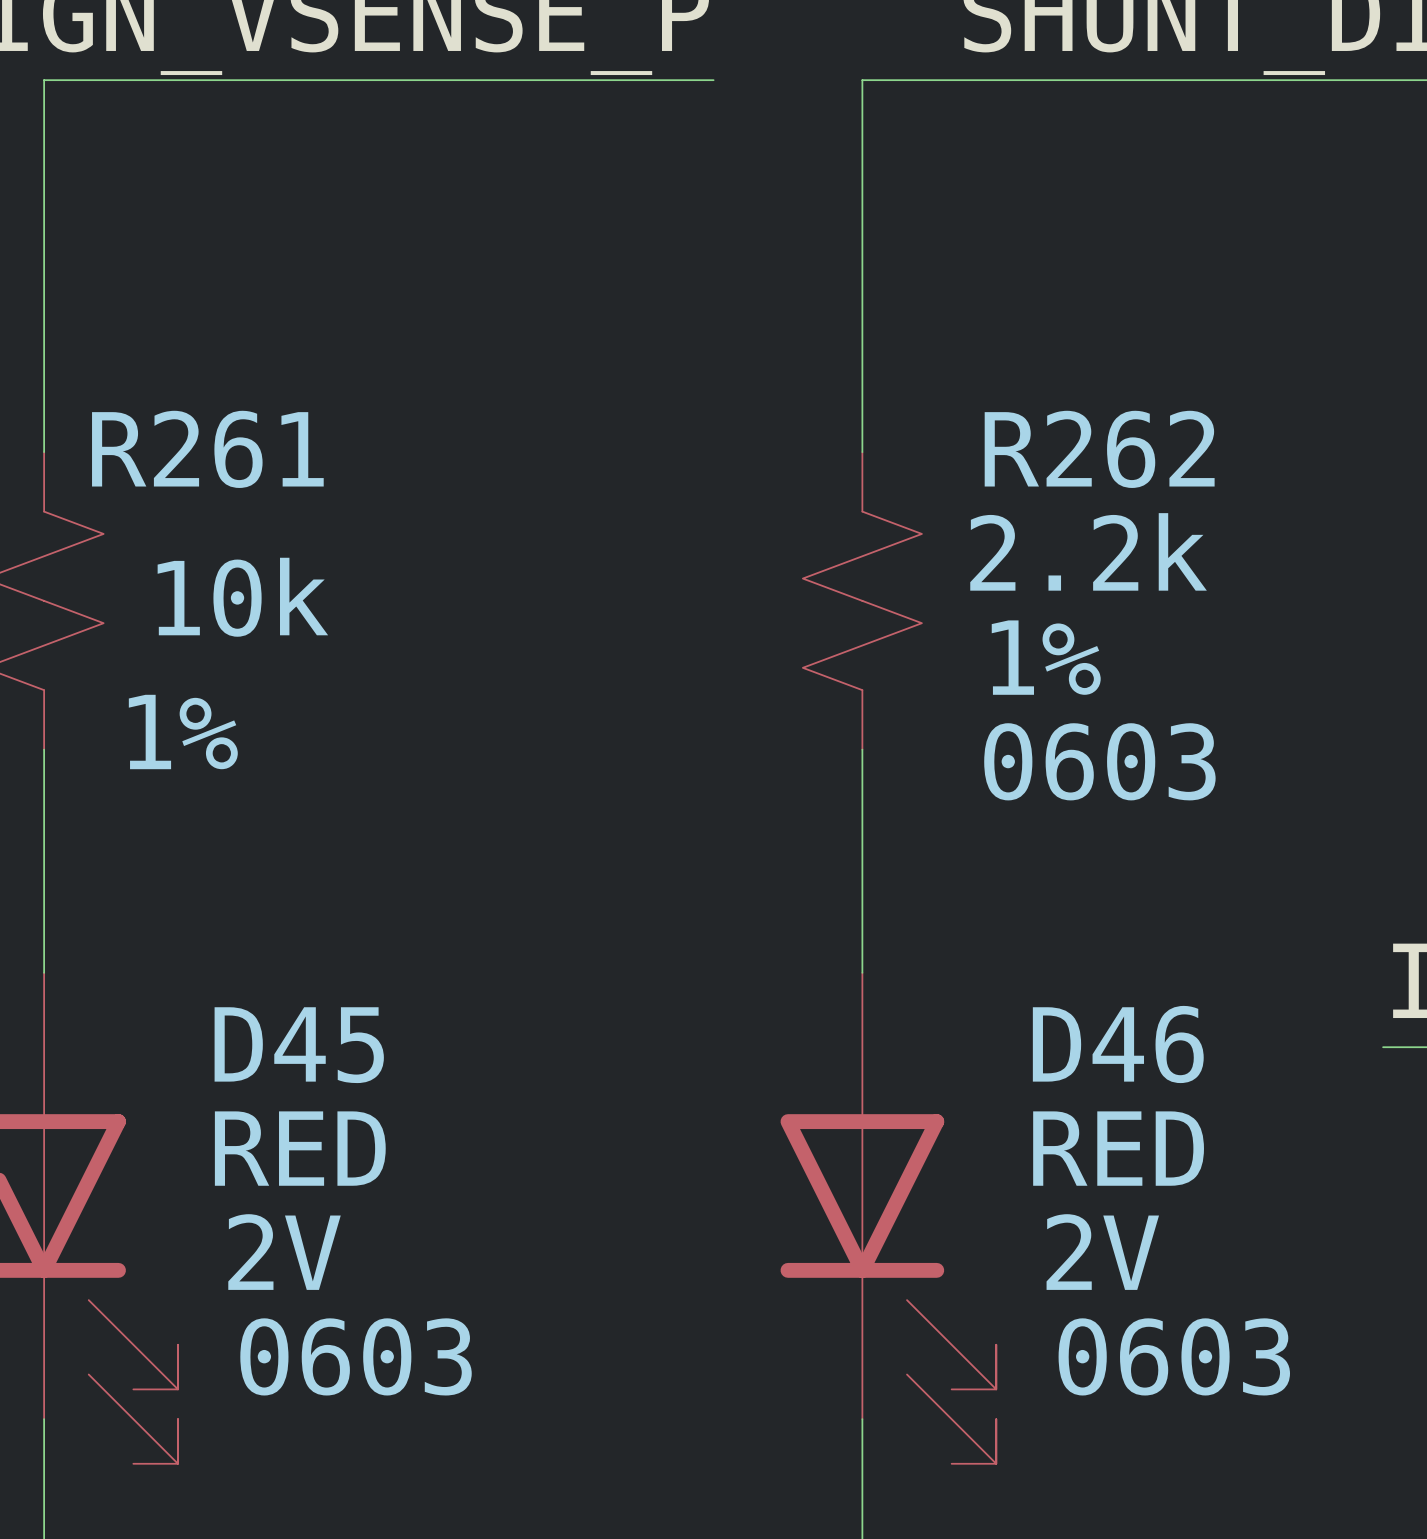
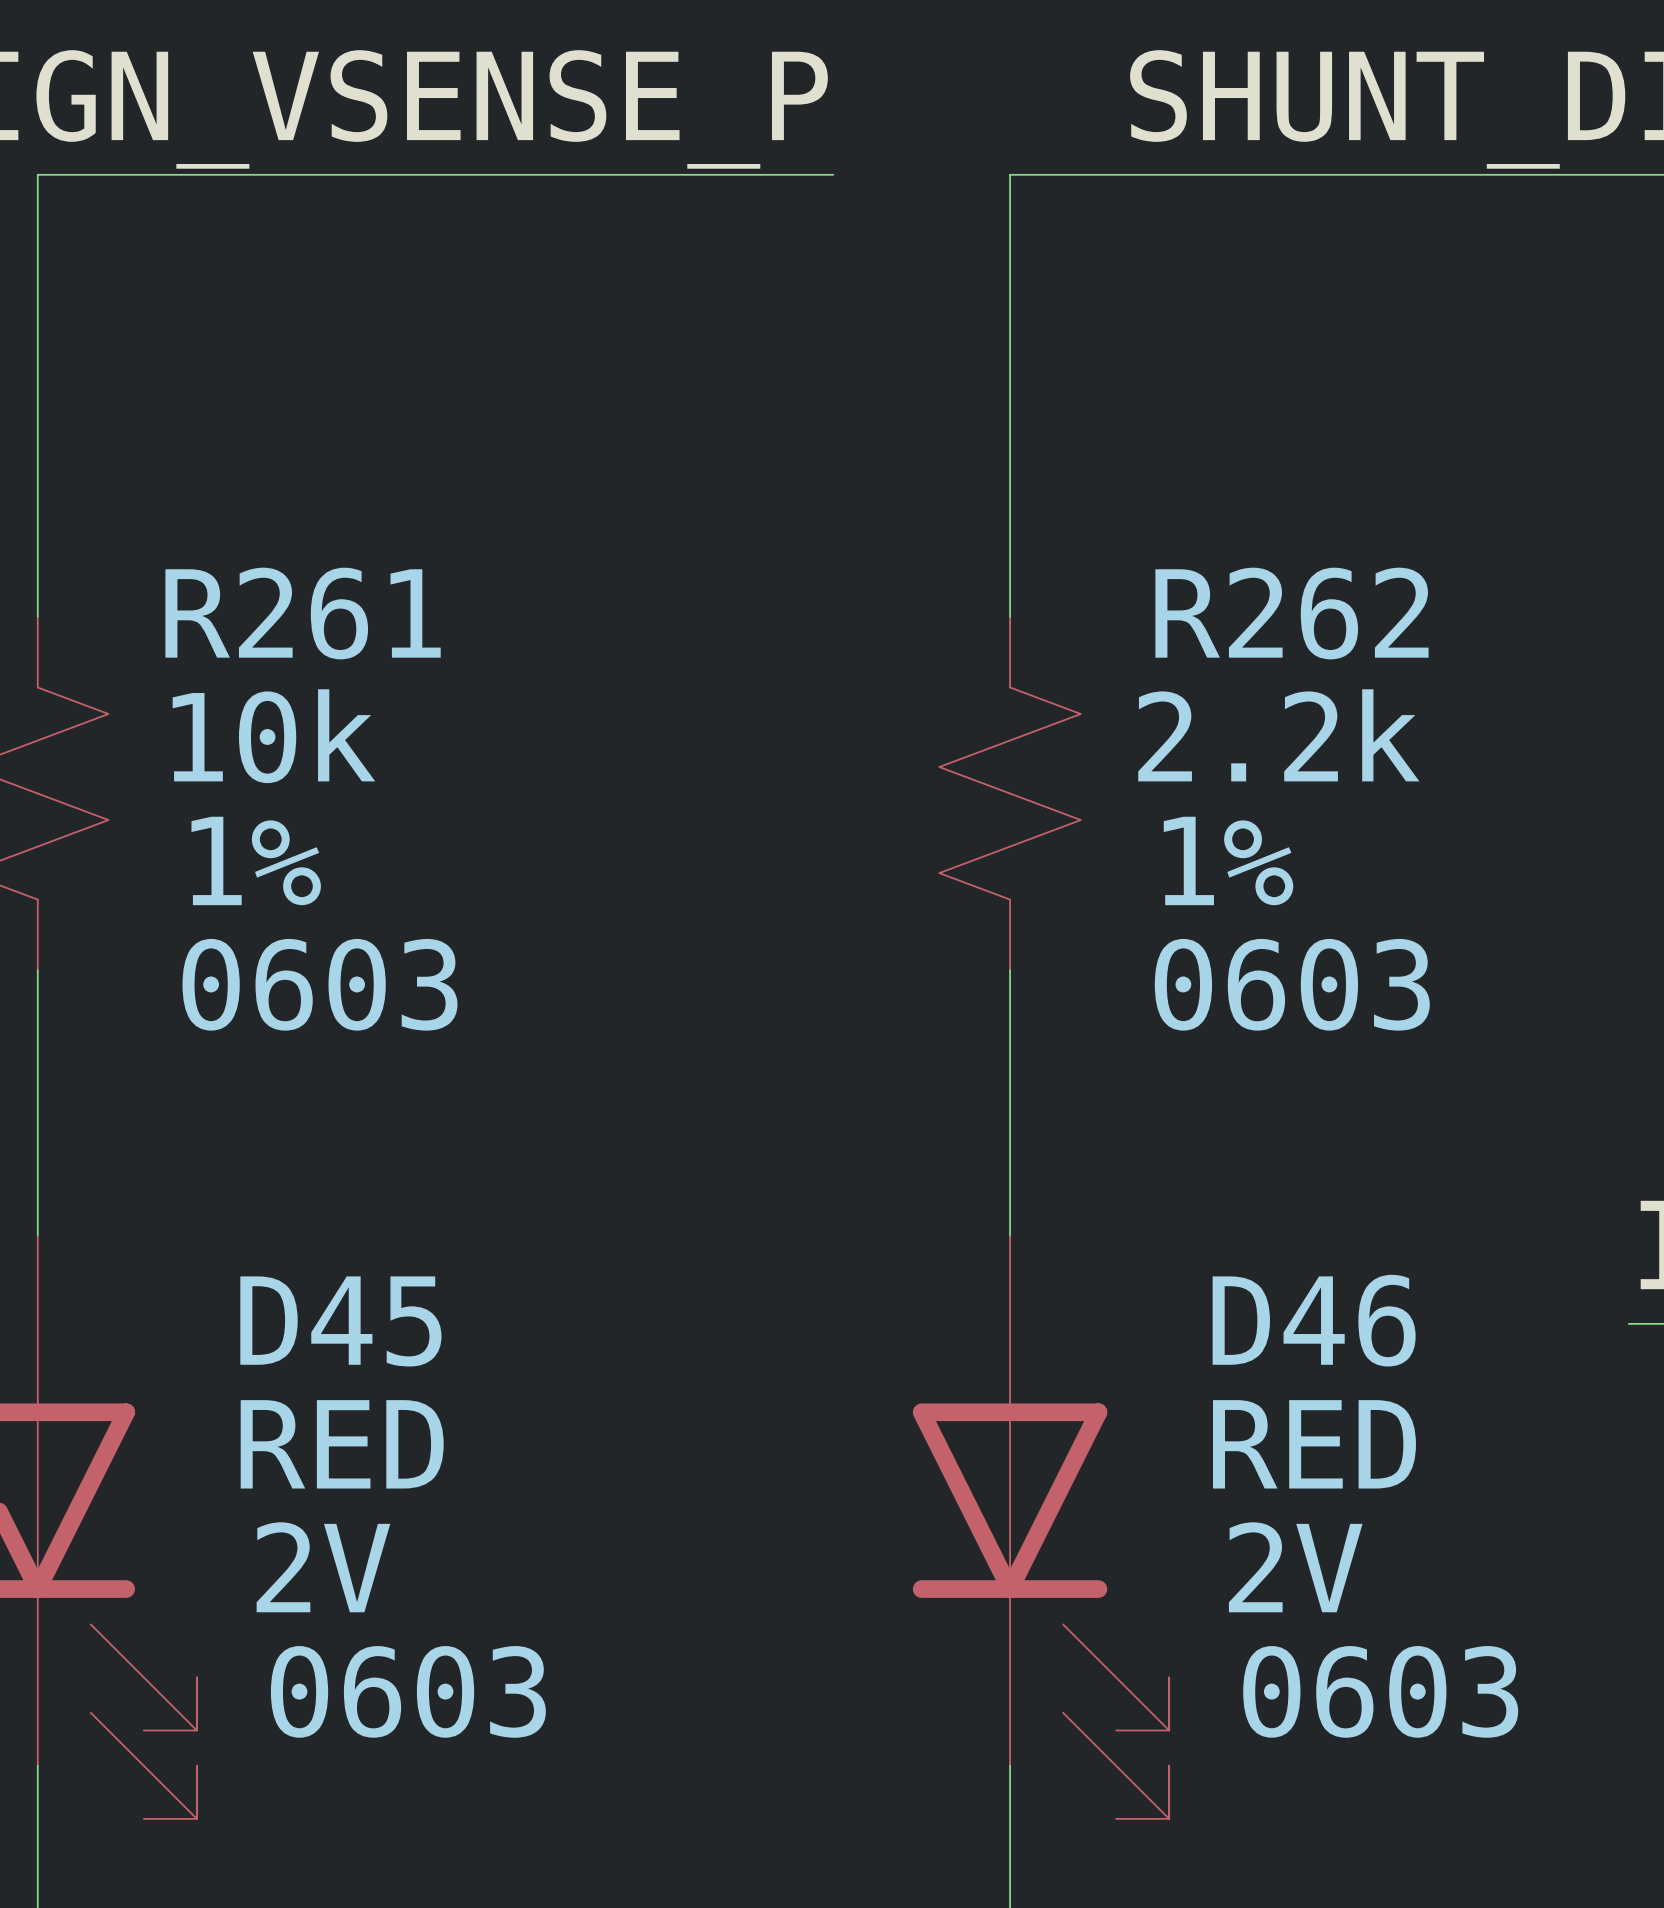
R261 name position: R261 (207, 449) -> R261 (303, 613)
R261 value position: 10k (242, 597) -> 10k (273, 736)
R261 text position: 1% (183, 732) -> 1% (256, 860)
R261 text: none -> 0603 (320, 984)

